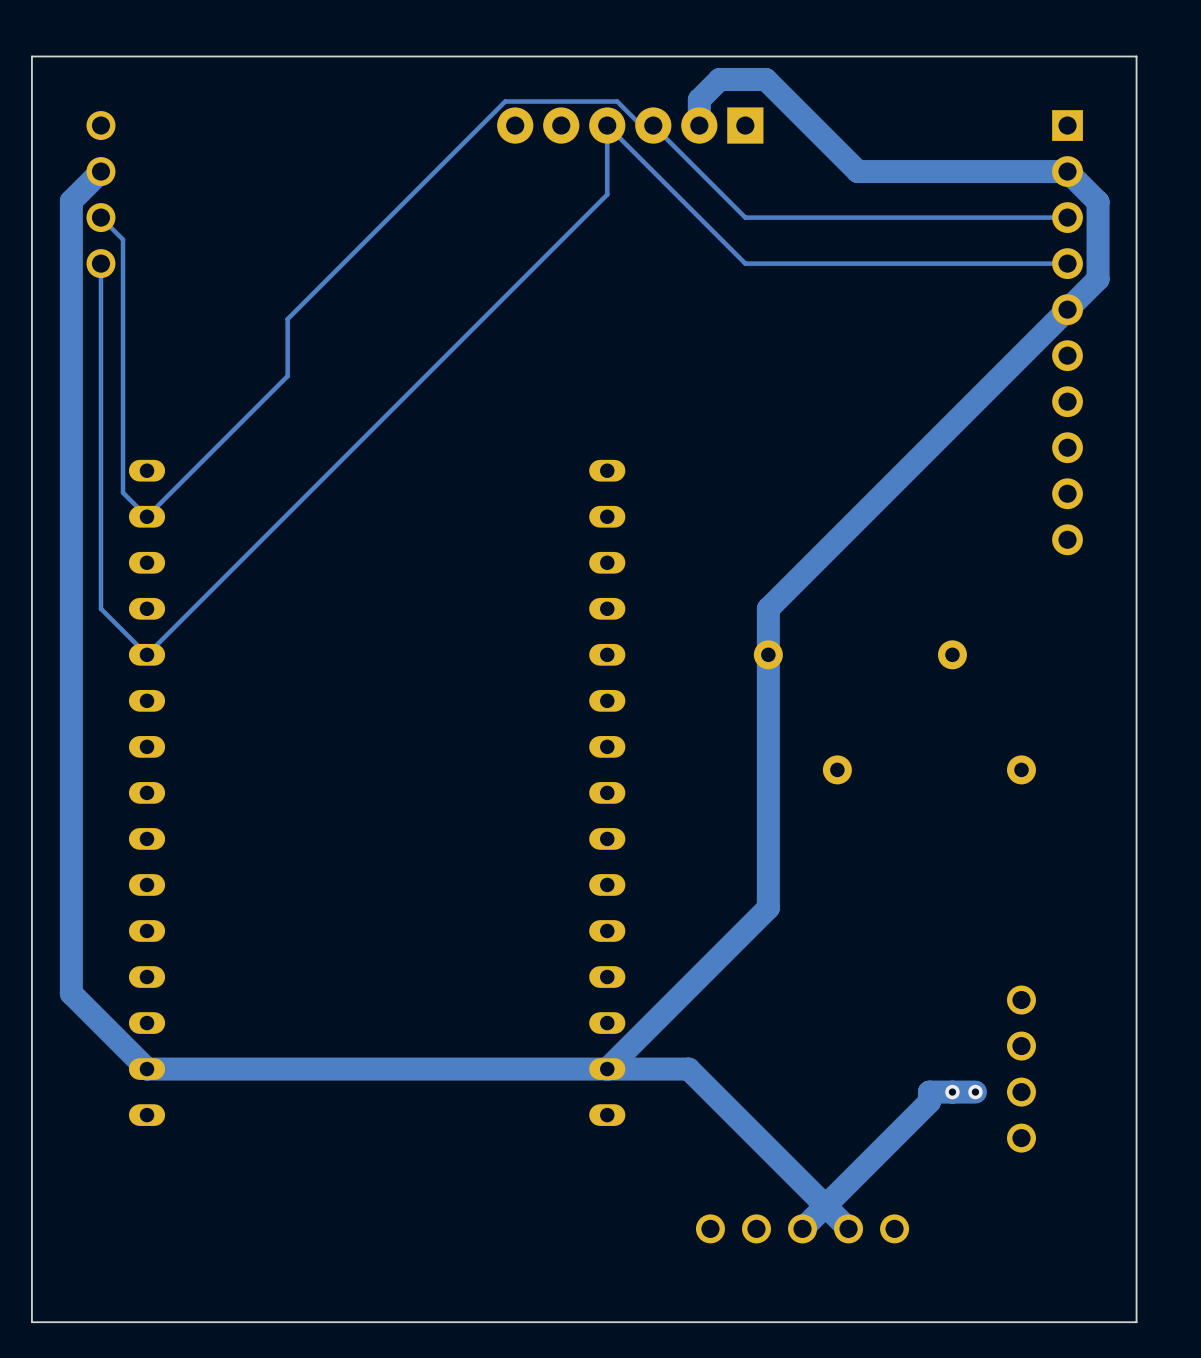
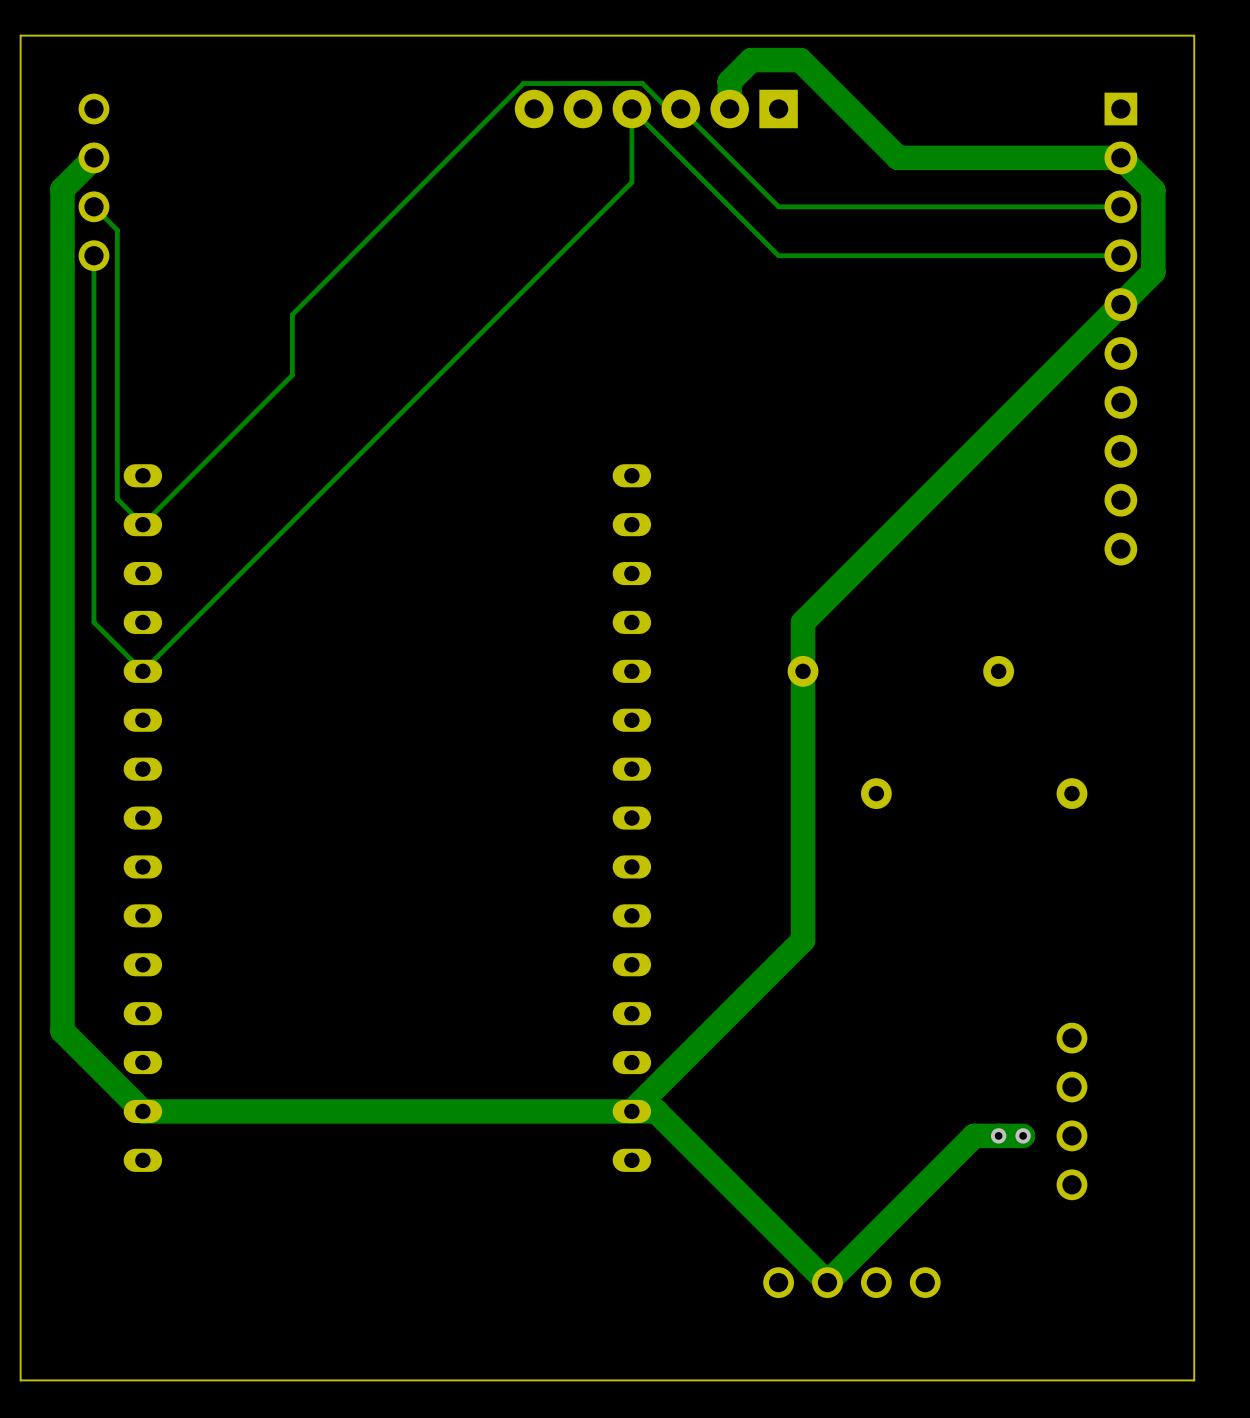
track: (630, 1069) (688, 1069) (848, 1228) -> (656, 1111) (827, 1282) (974, 1135)
track: (929, 1092) (929, 1101) (802, 1228) -> none
part footprint: [695, 1214, 910, 1244] -> [763, 1267, 941, 1299]

